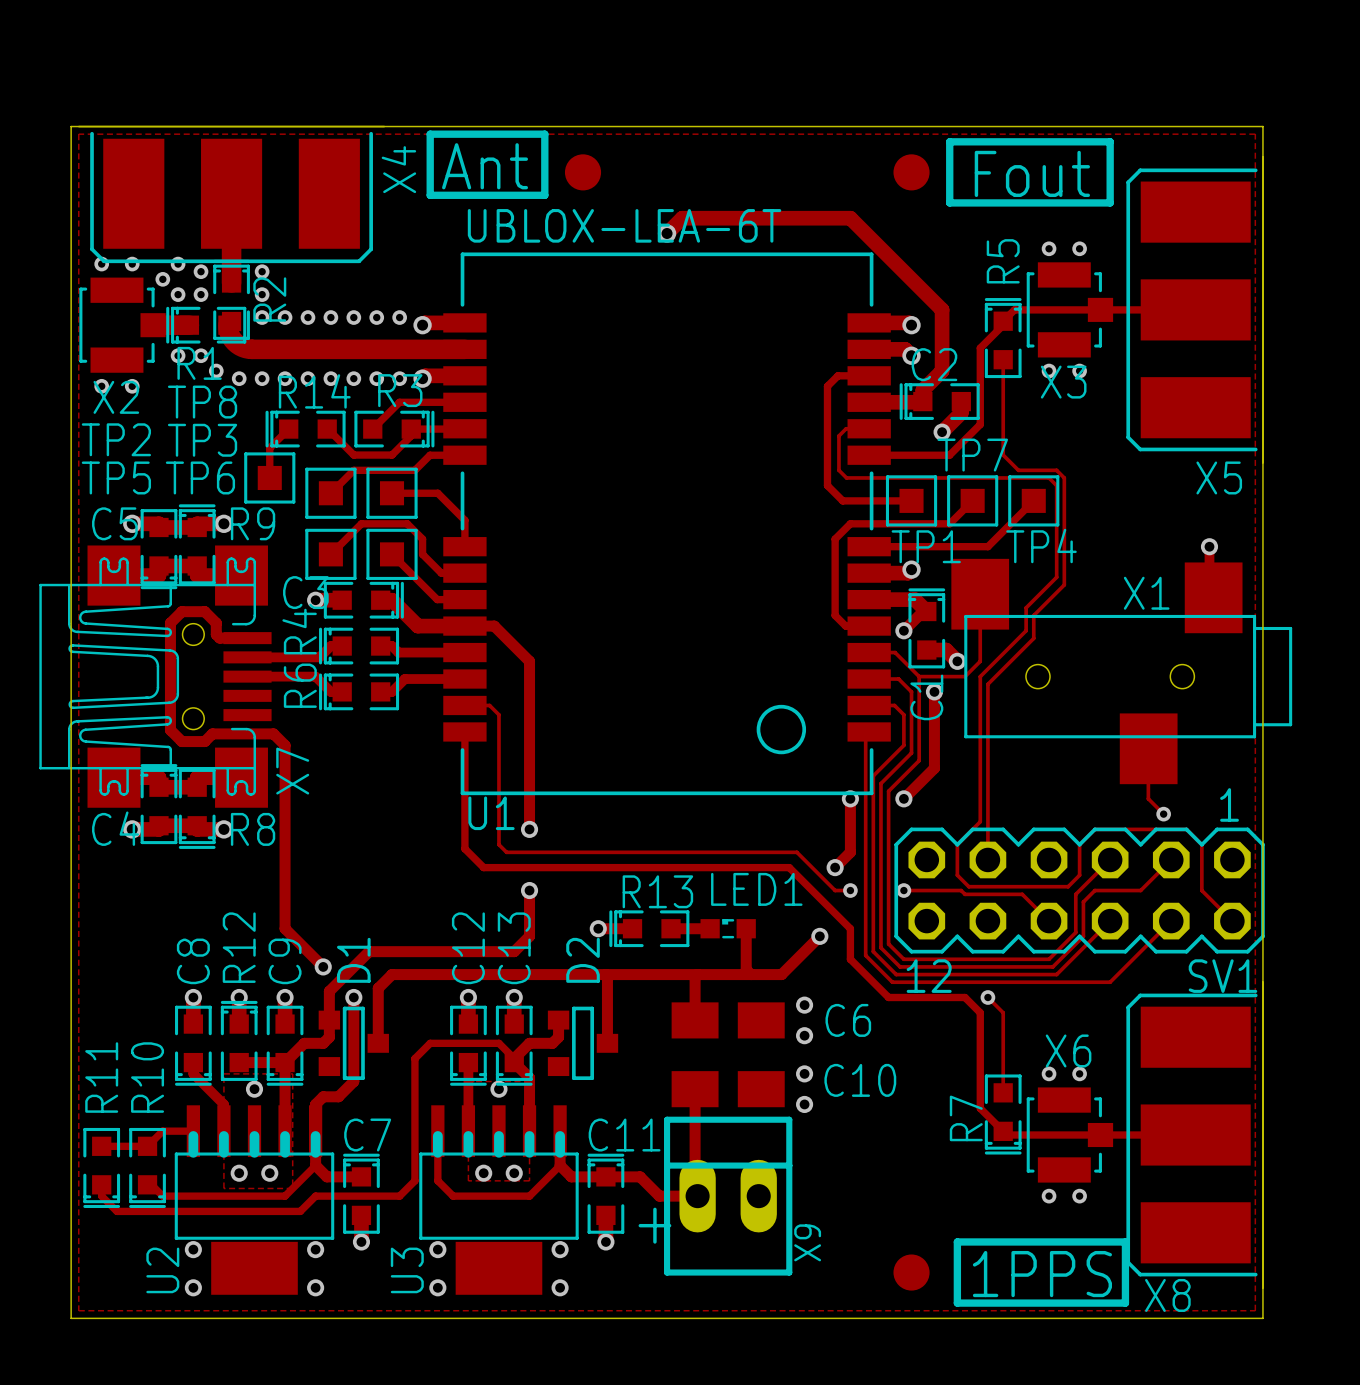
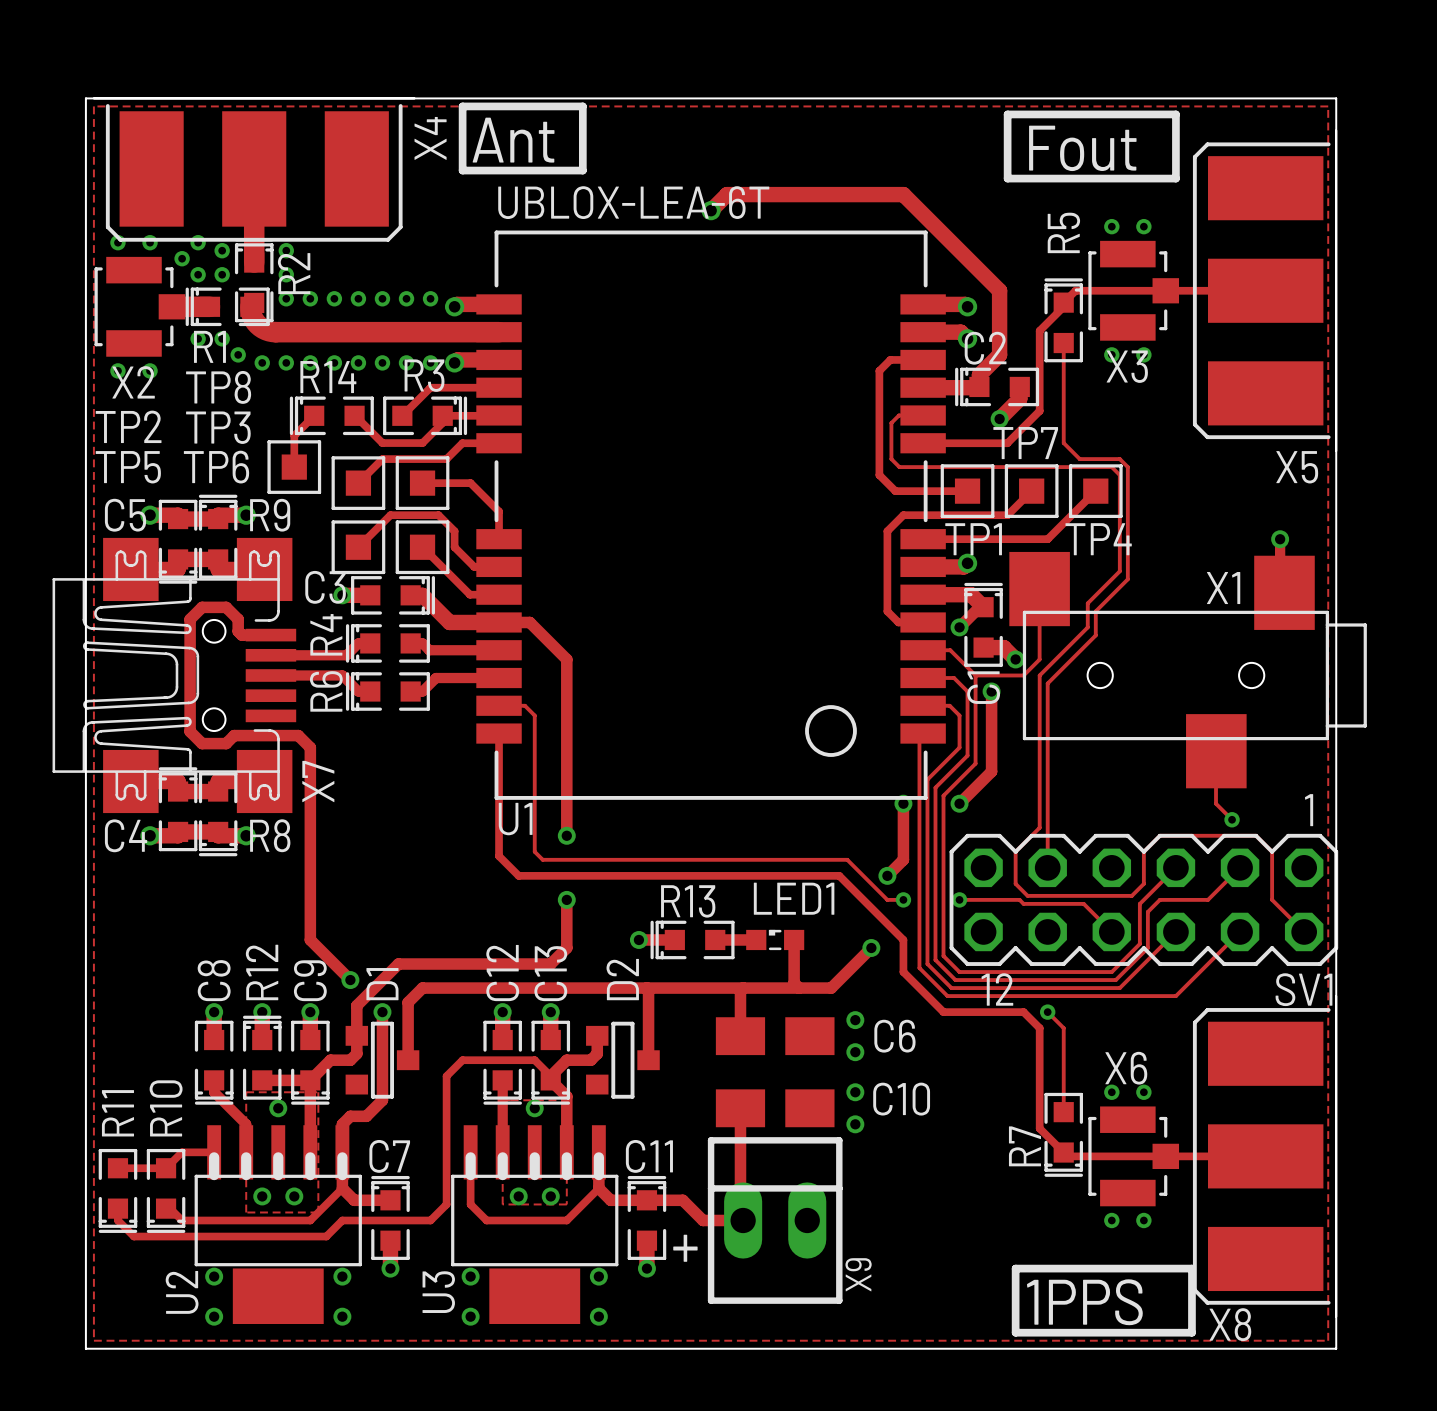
drawing: [564, 154, 602, 191] -> none
drawing: [893, 154, 930, 191] -> none
drawing: [893, 1254, 930, 1291] -> none

